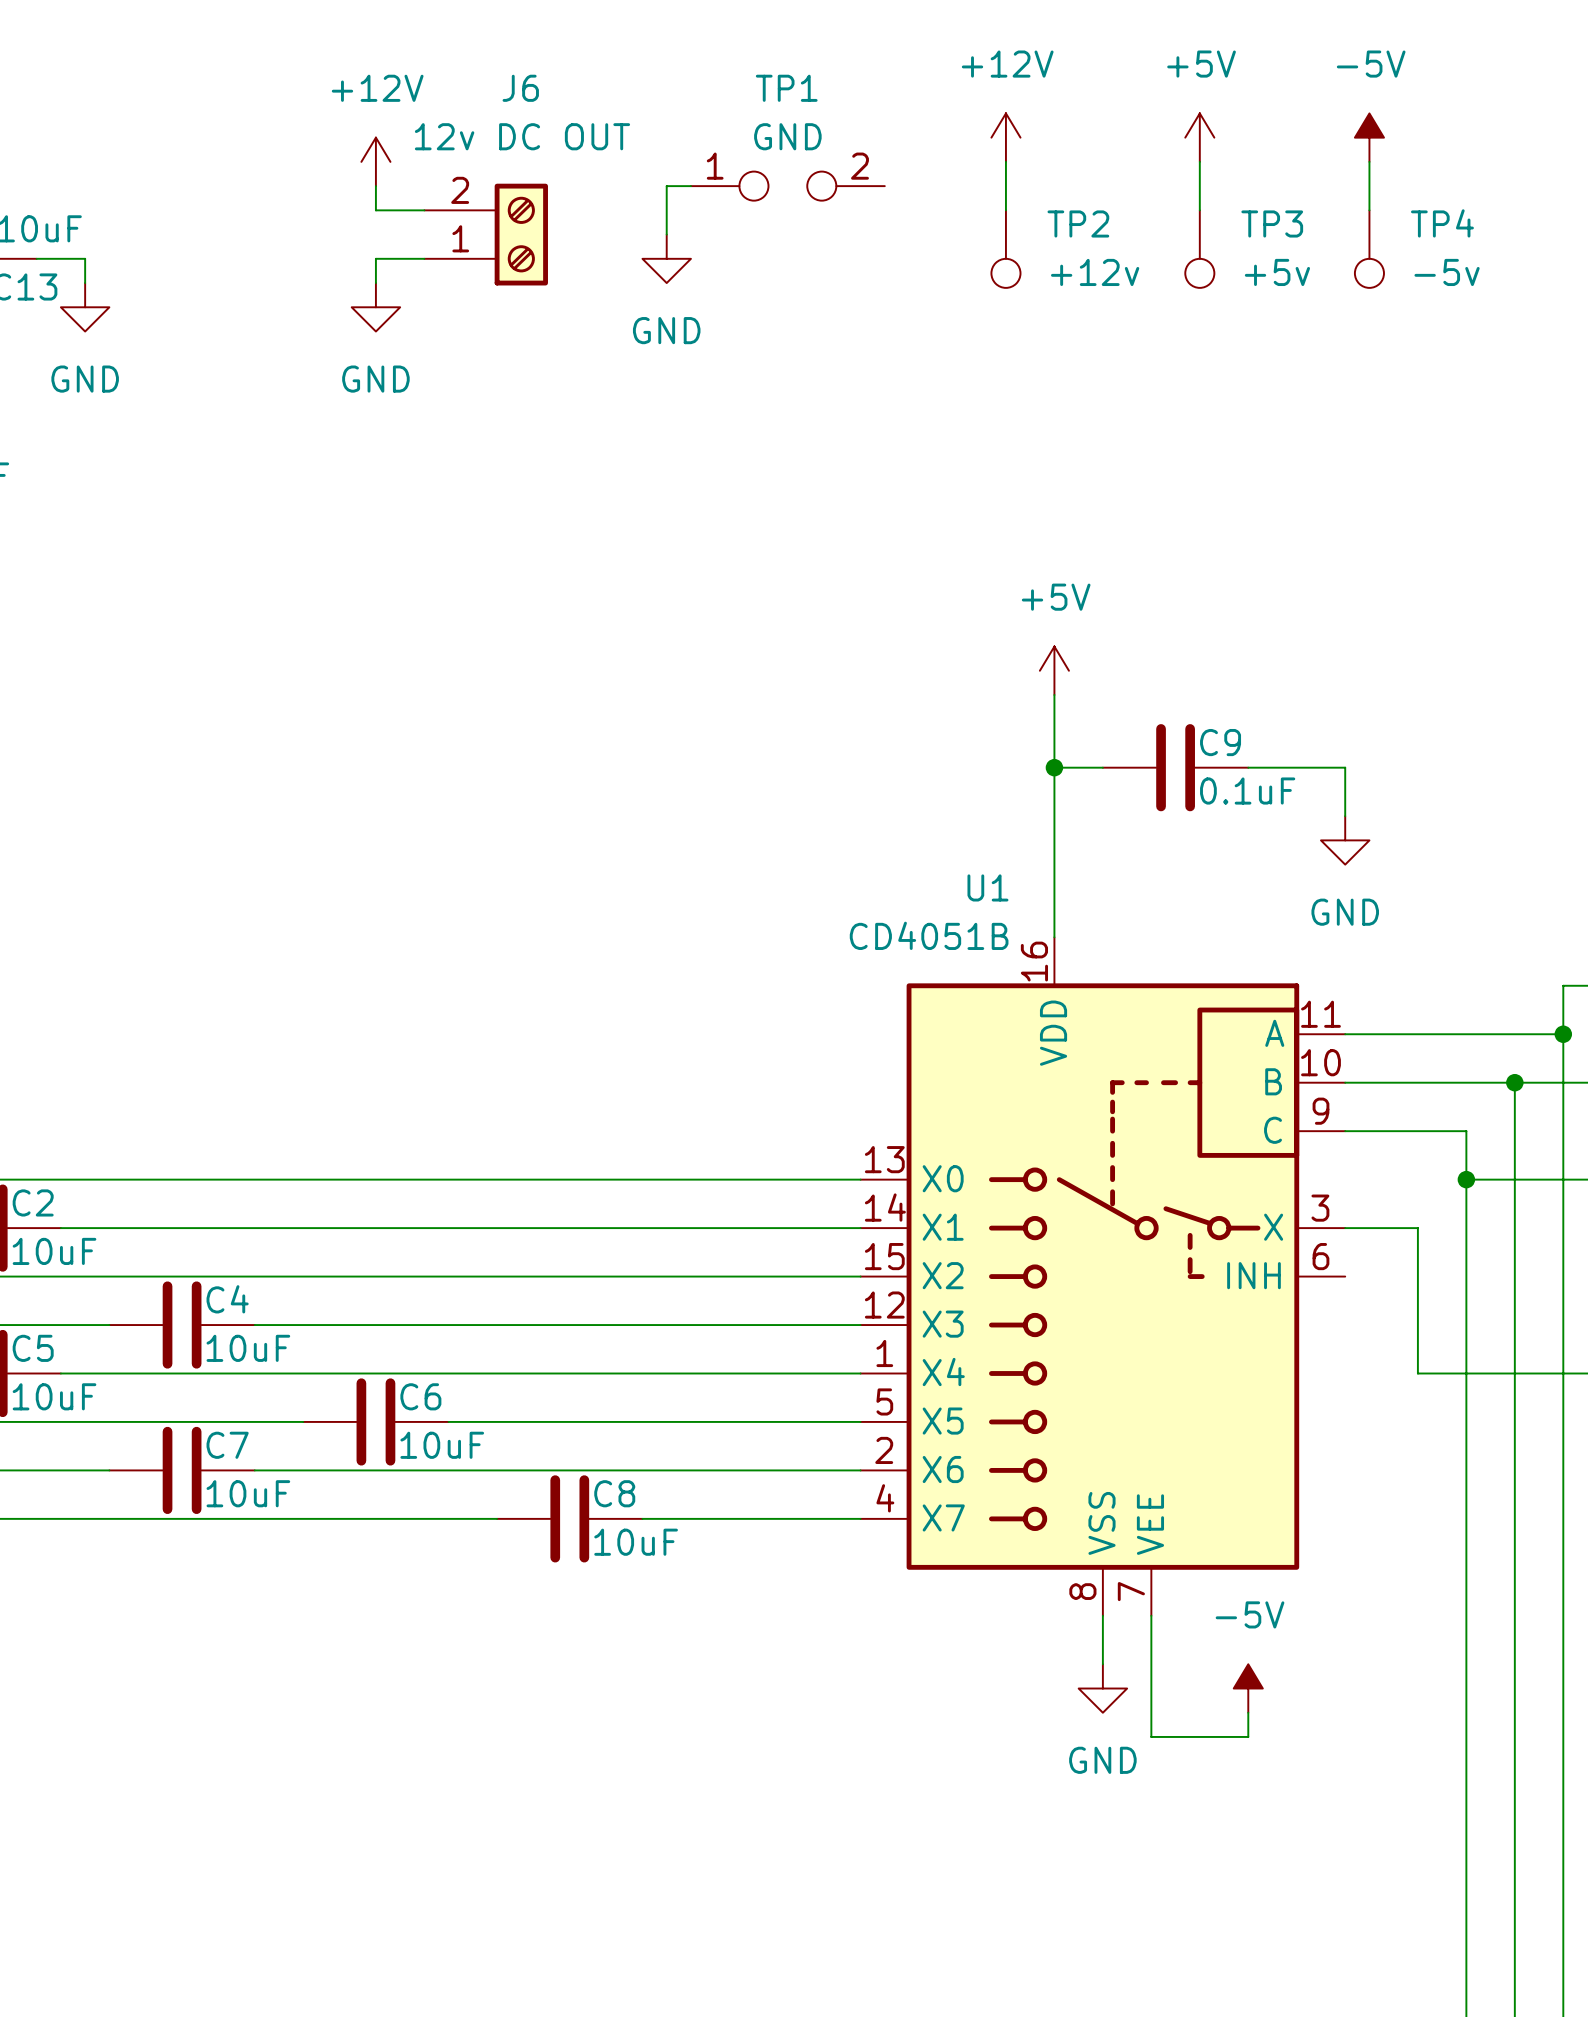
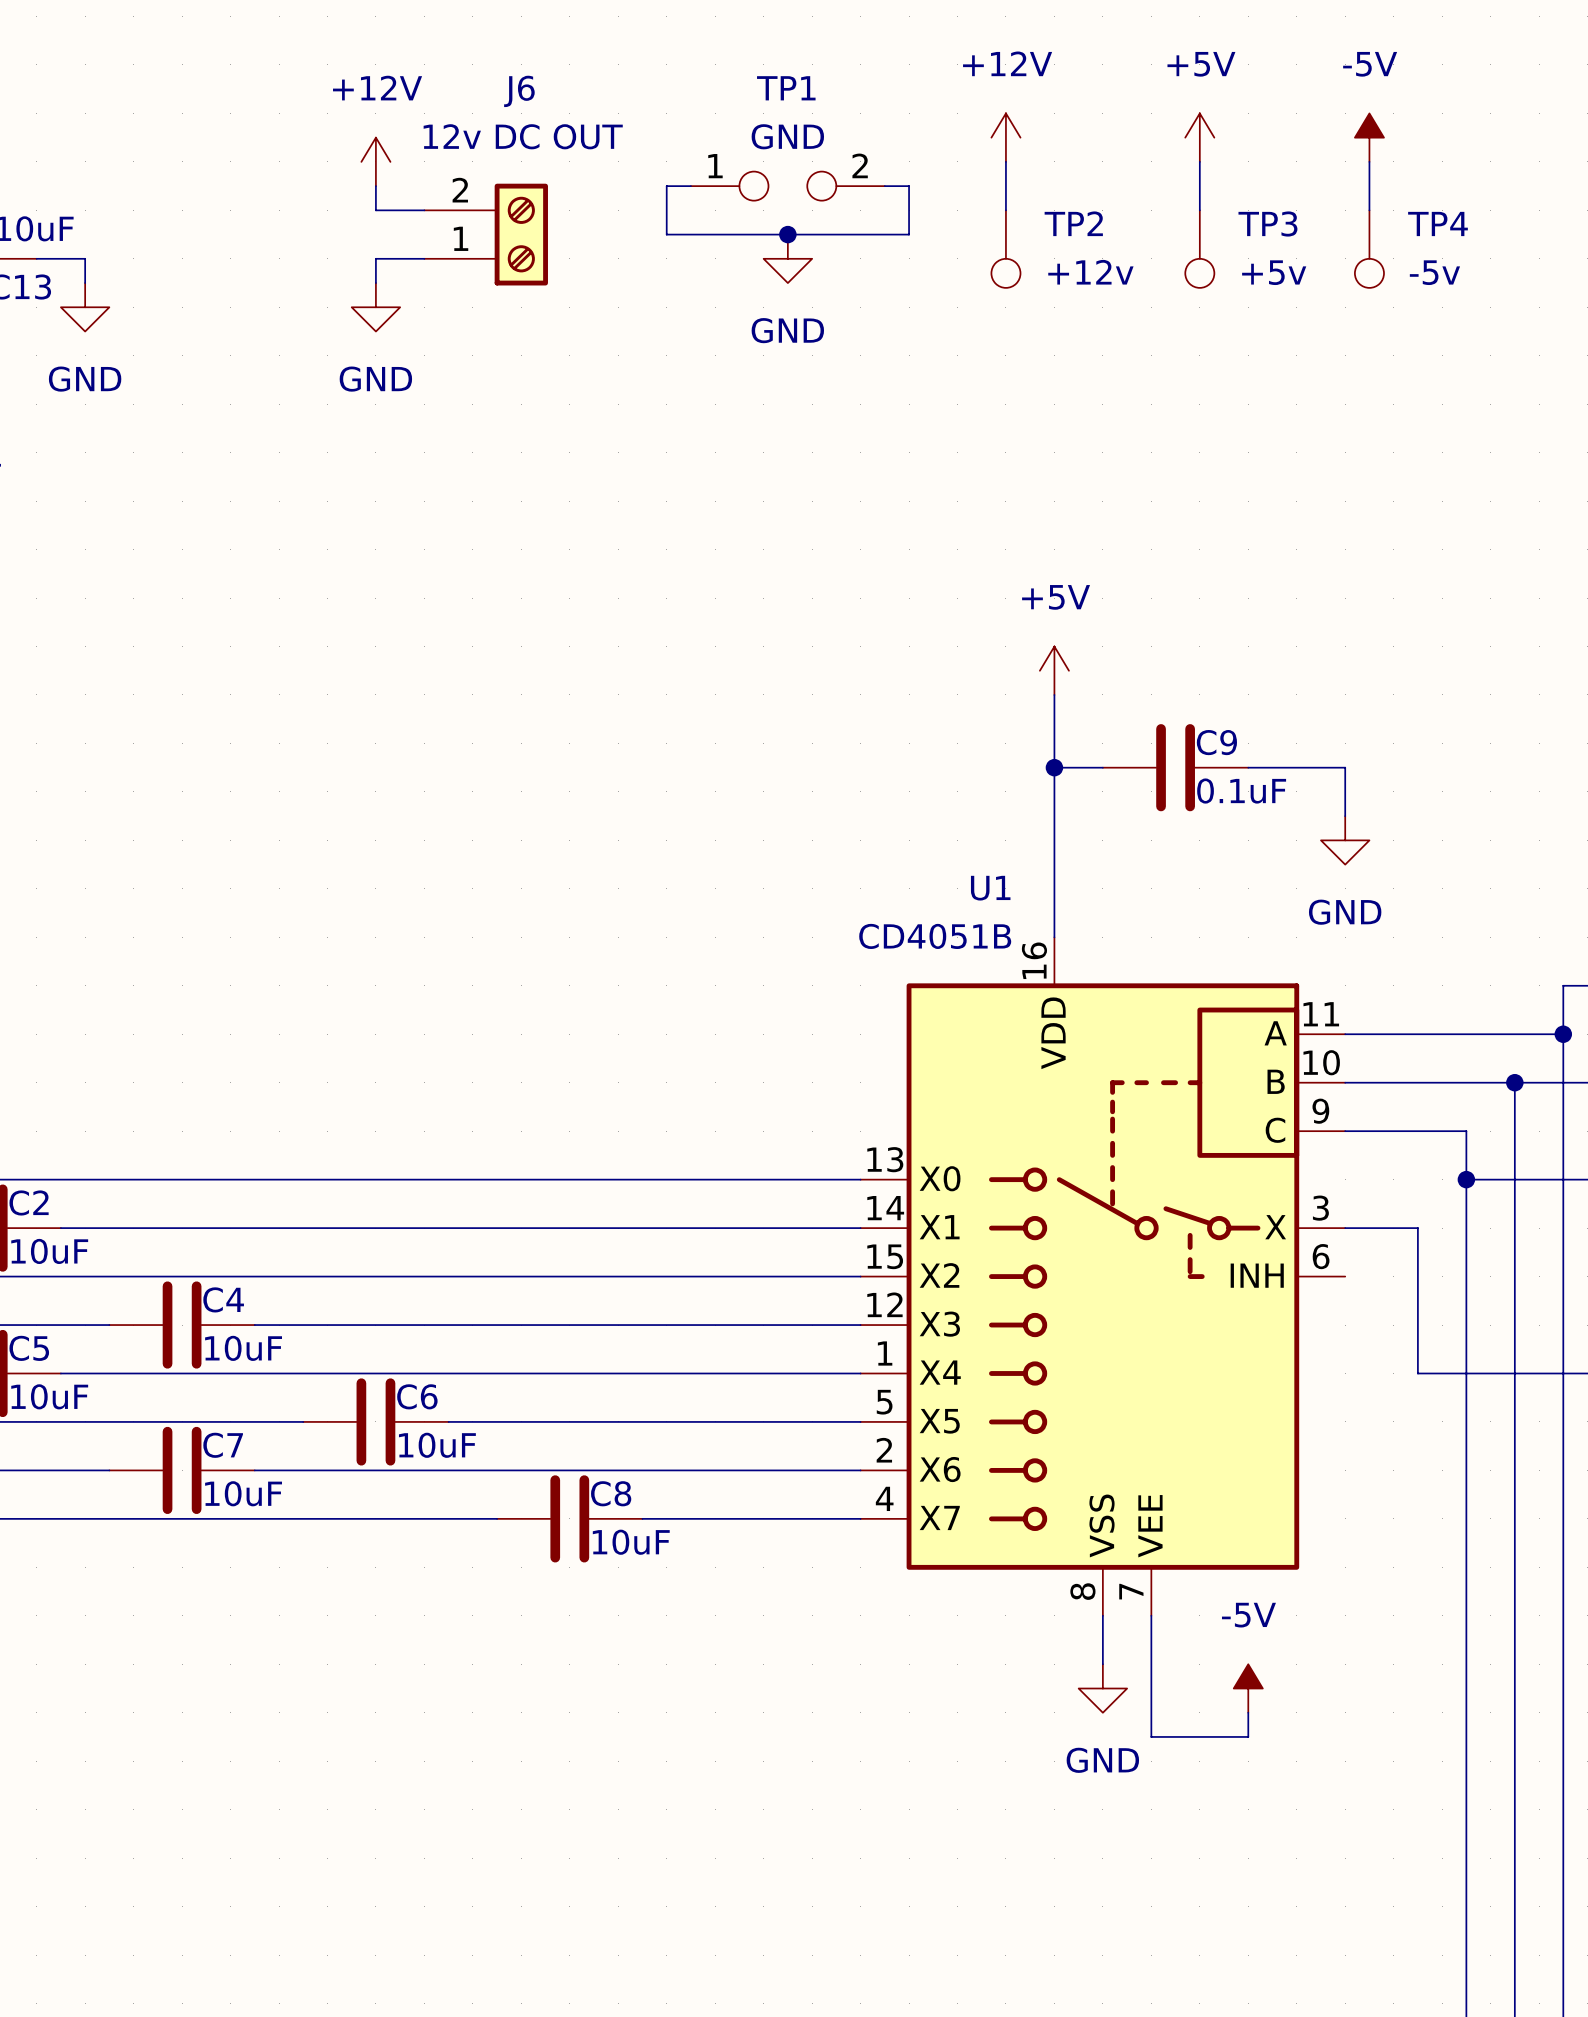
wire: none -> (884, 186) (909, 186) (909, 234) (666, 234)
junction: none -> (787, 234)
power symbol position: GND (666, 258) -> GND (787, 258)

